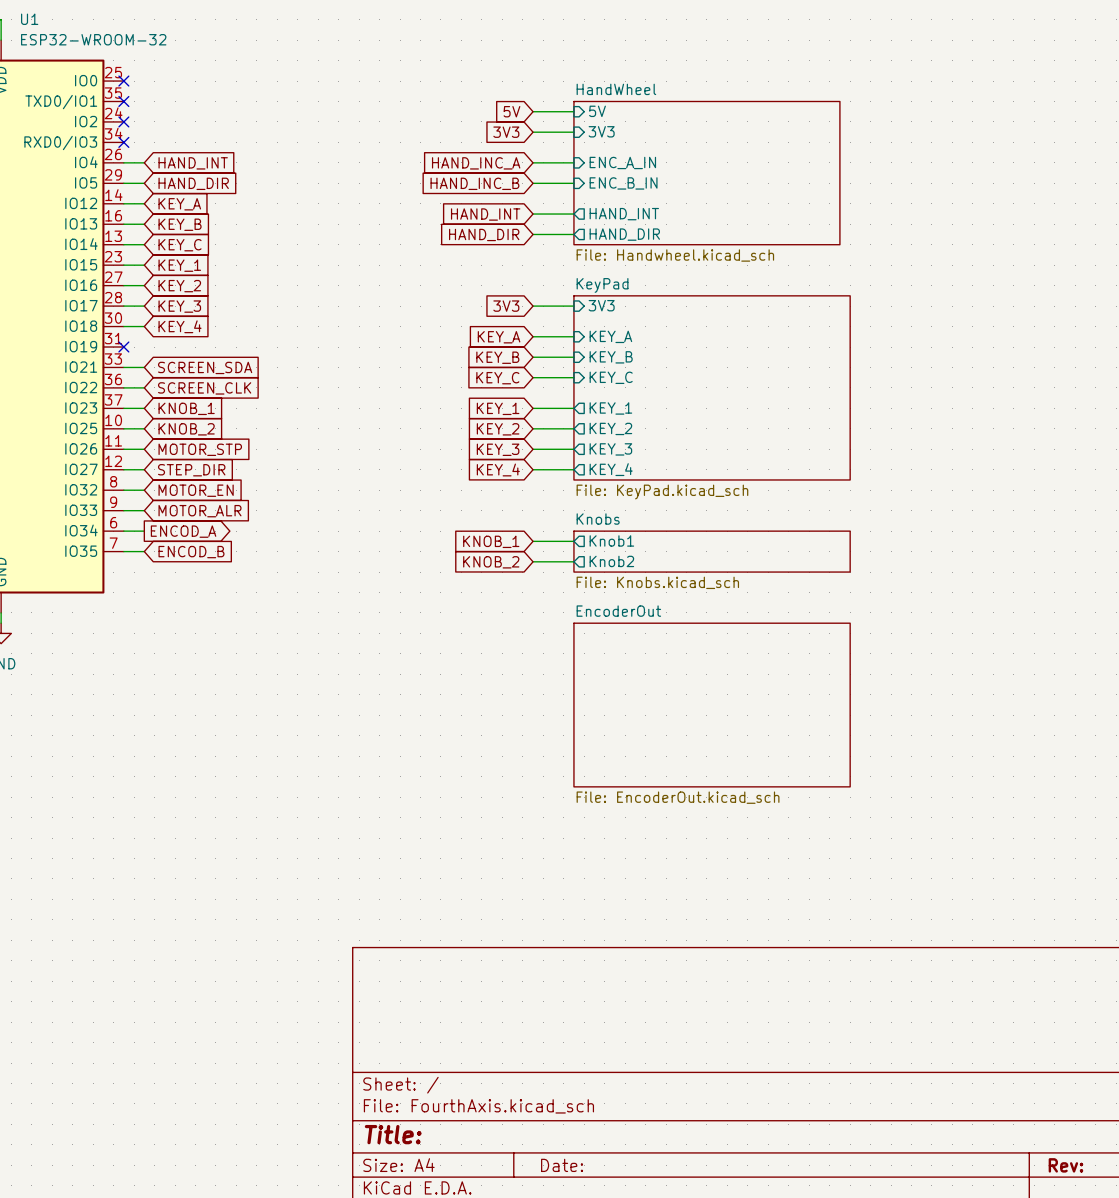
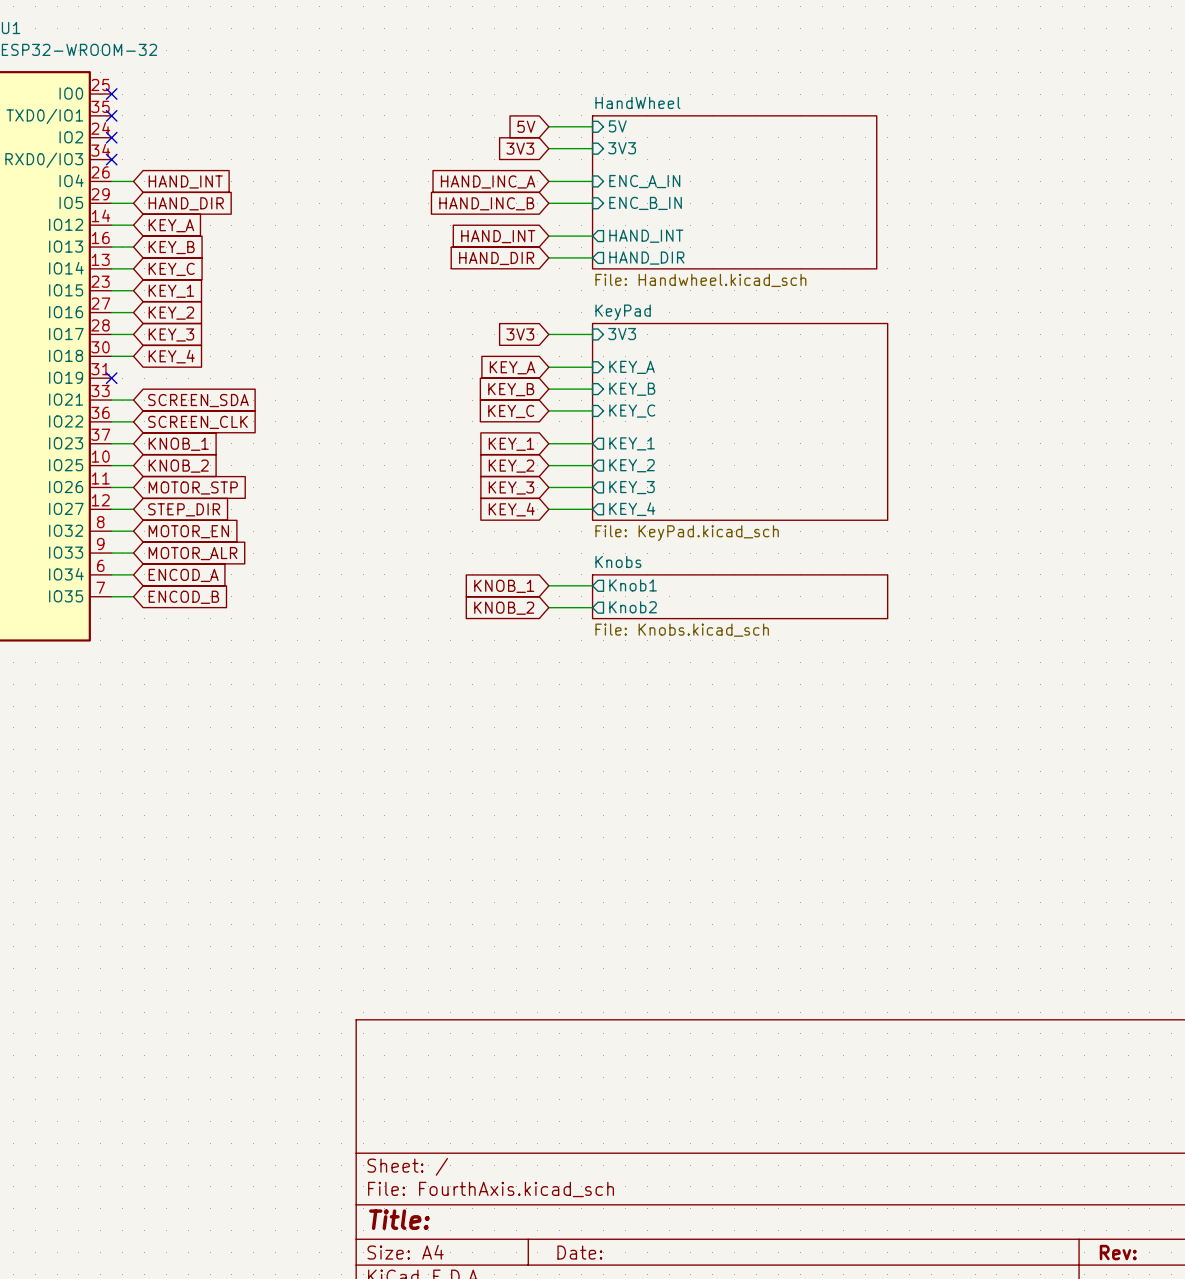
global label shape: output (183, 531) -> input (183, 575)
sheet EncoderOut: File: EncoderOut.kicad_sch (712, 705) -> none

